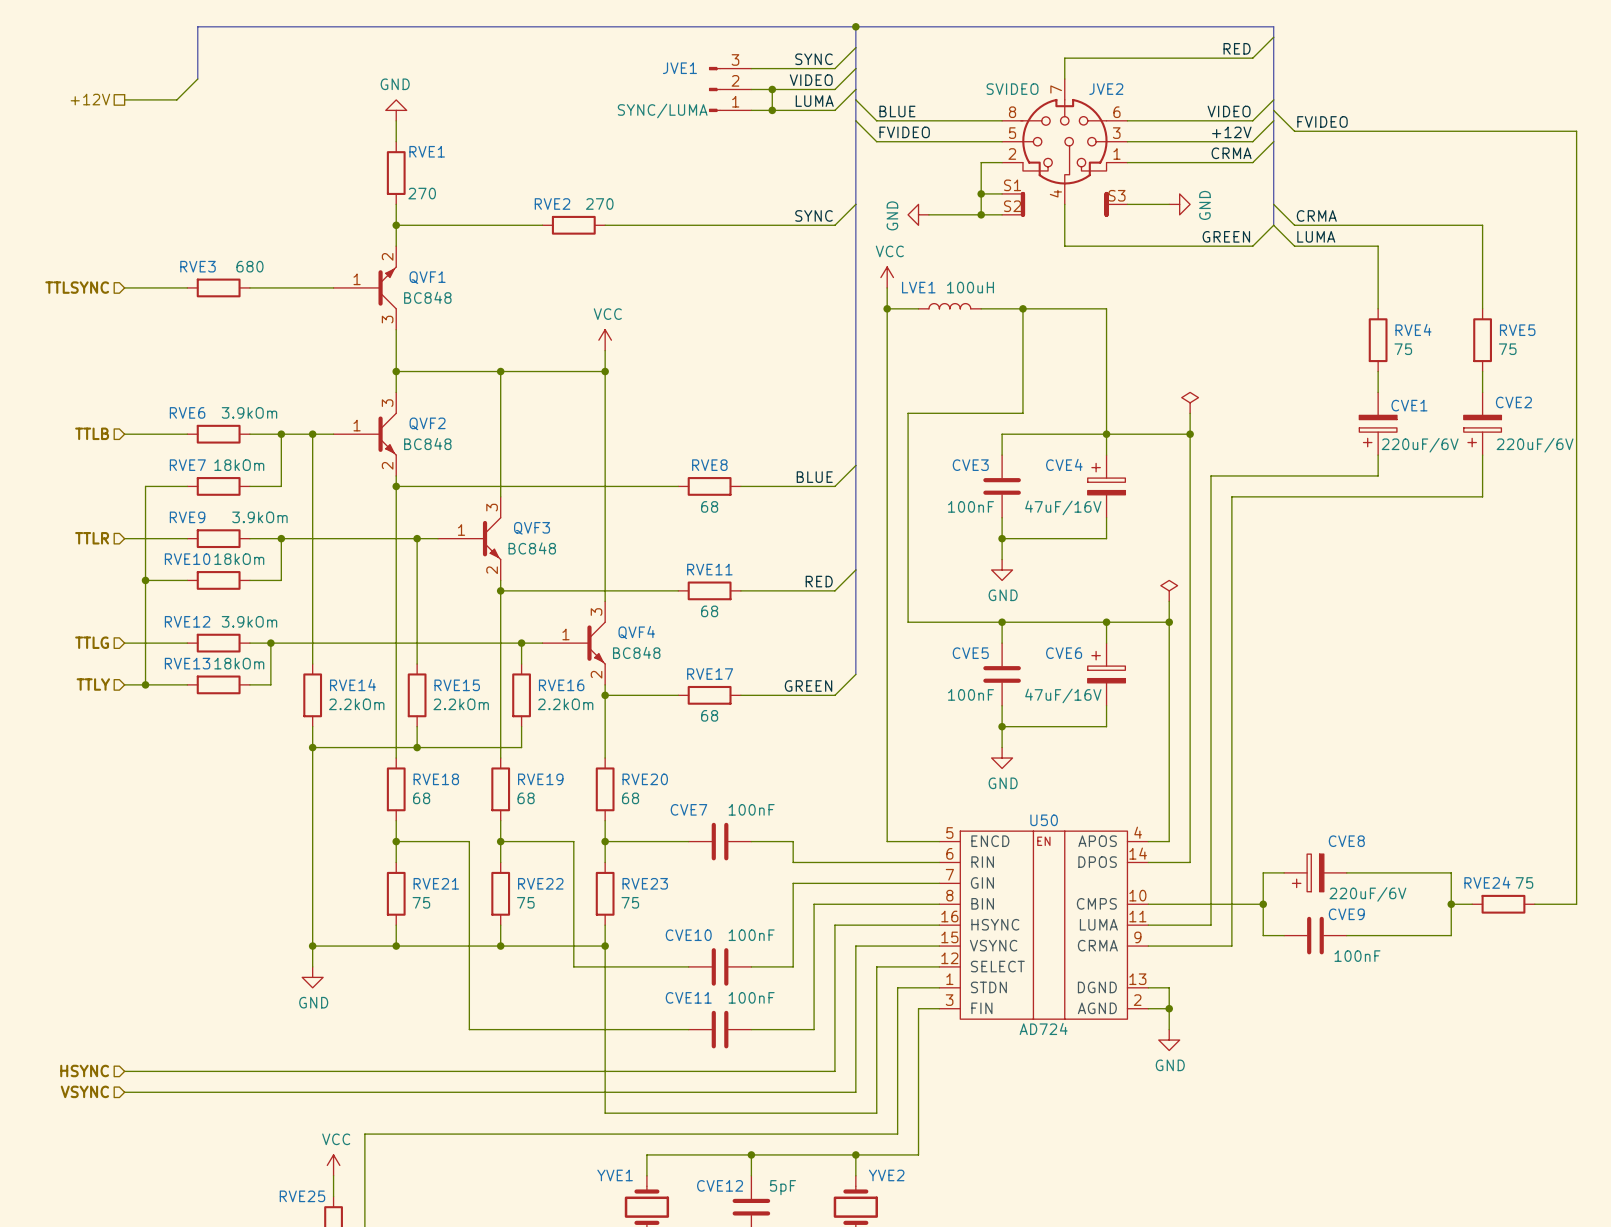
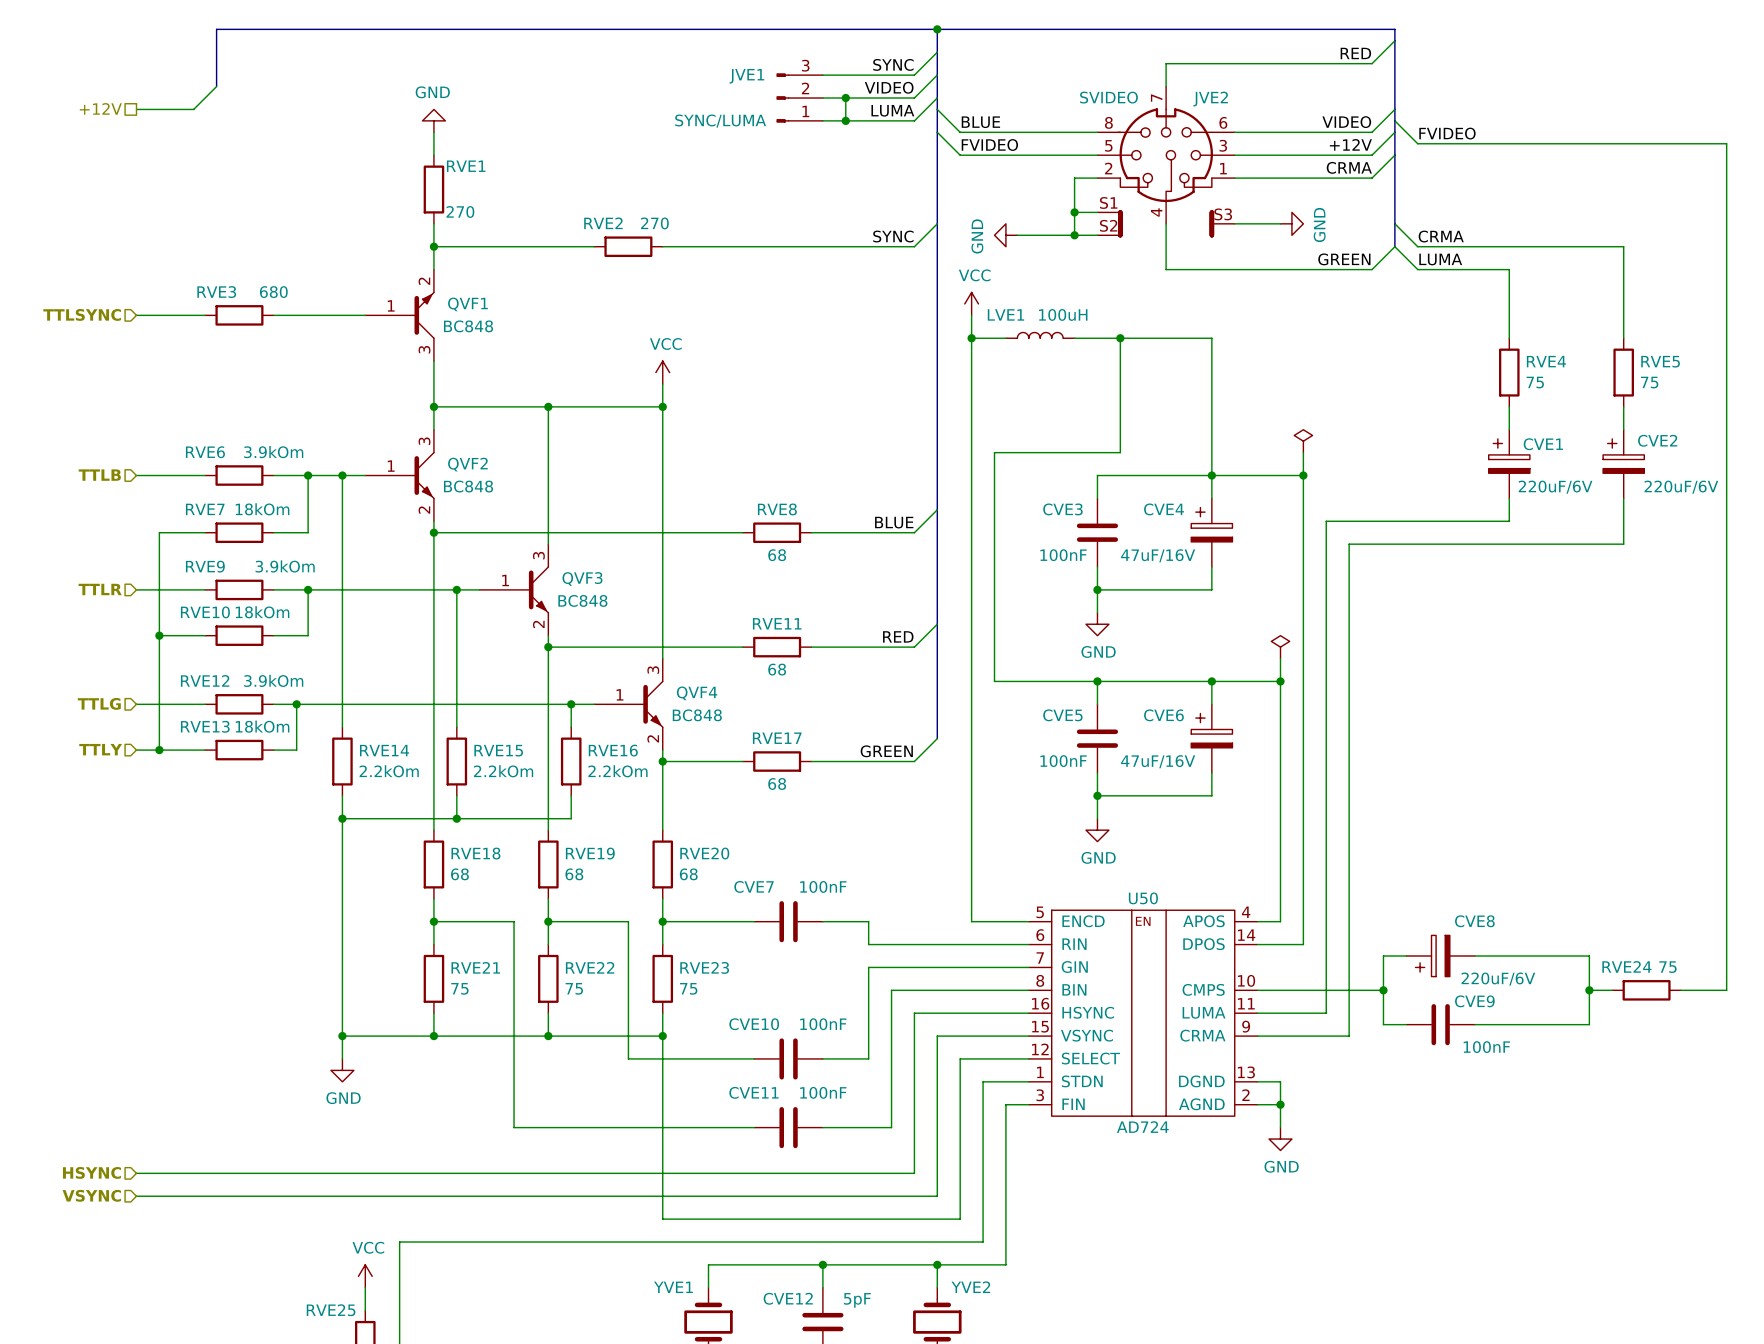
CVE1 flip: as is (1378, 431) -> up-down (1509, 456)
CVE2 flip: as is (1482, 431) -> up-down (1623, 456)

